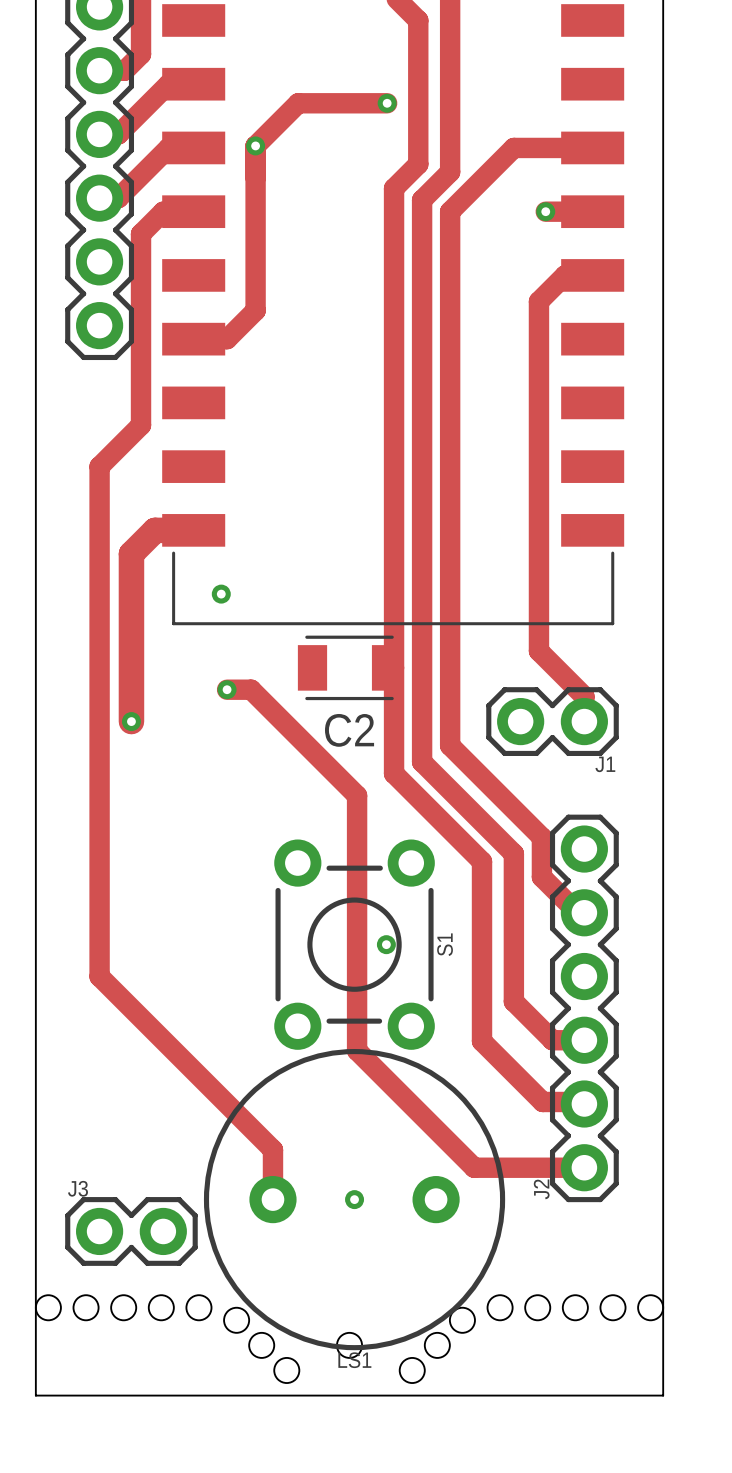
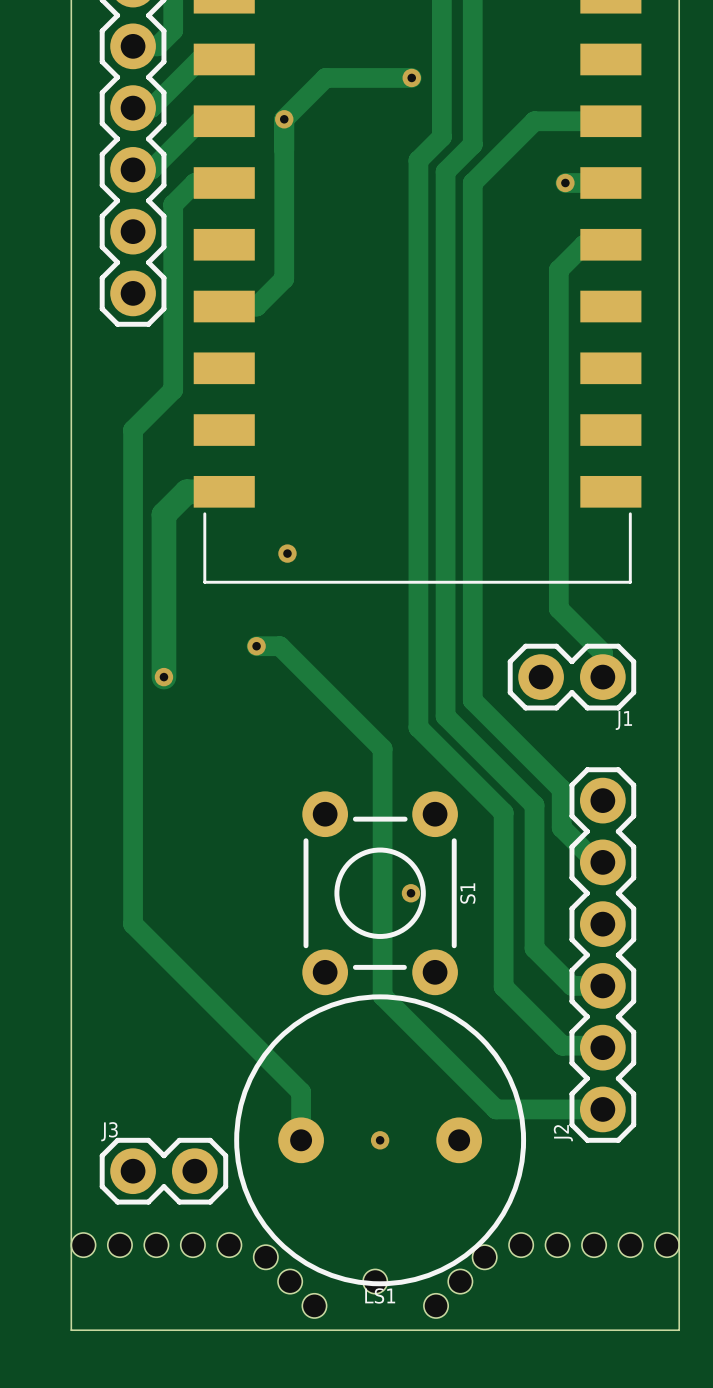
via position: (221, 594) -> (287, 553)
C2: (349, 667) -> none

